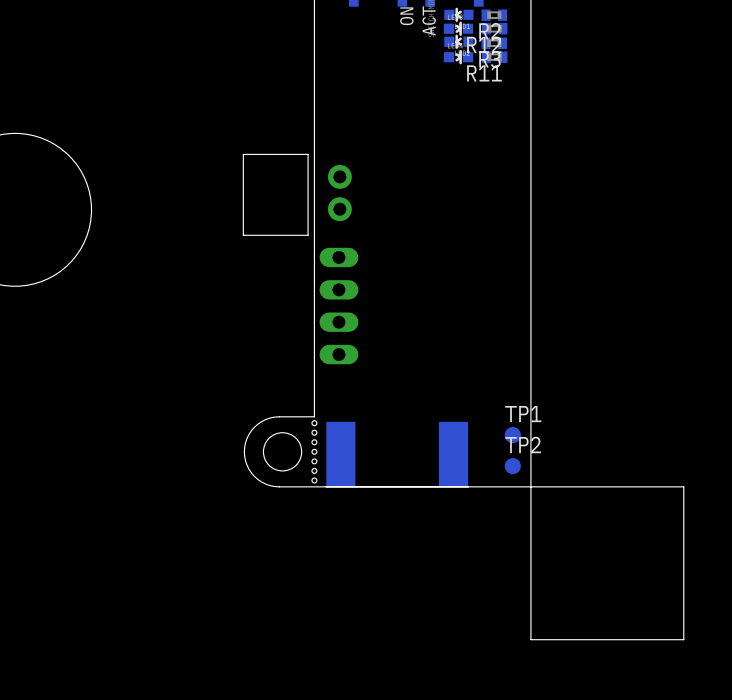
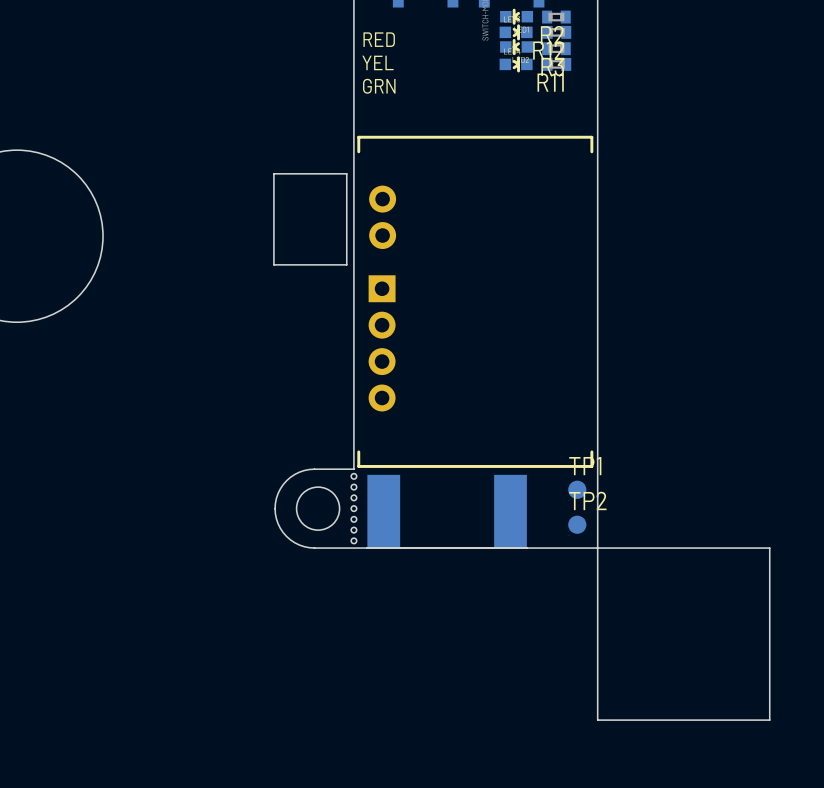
text: ON (406, 16) -> none
text: ACT (429, 20) -> none
text: none -> RED (379, 39)
text: none -> YEL (377, 62)
text: none -> GRN (379, 86)
line: none -> (591, 151) (591, 137) (358, 137) (358, 151)
part footprint: [319, 247, 359, 365] -> [368, 275, 396, 412]
line: none -> (591, 451) (591, 466) (358, 466) (358, 451)

